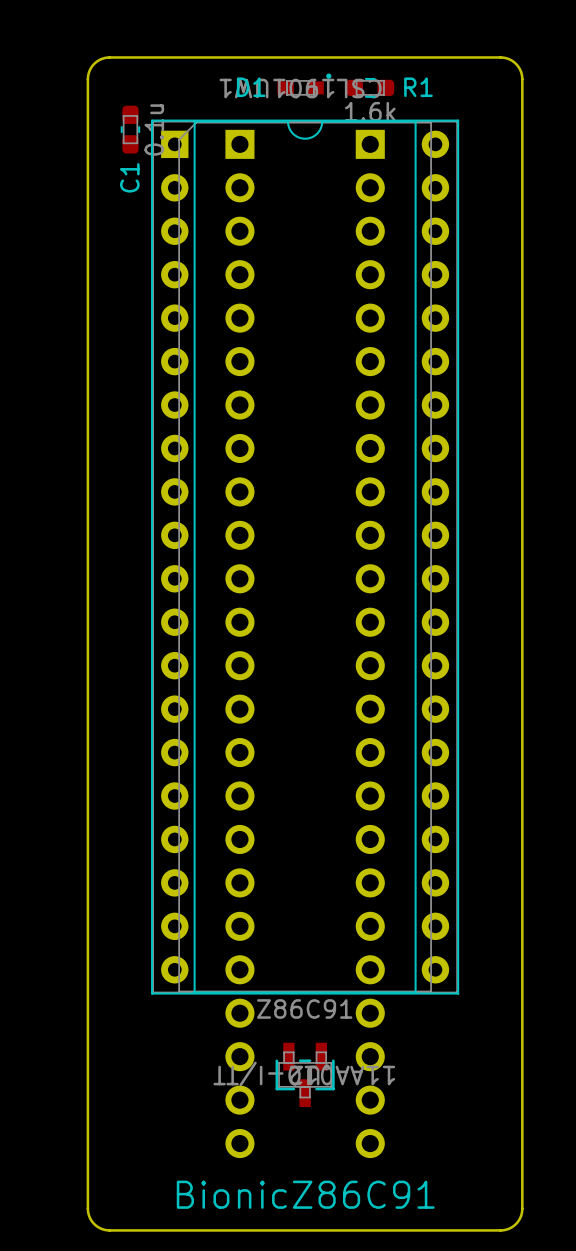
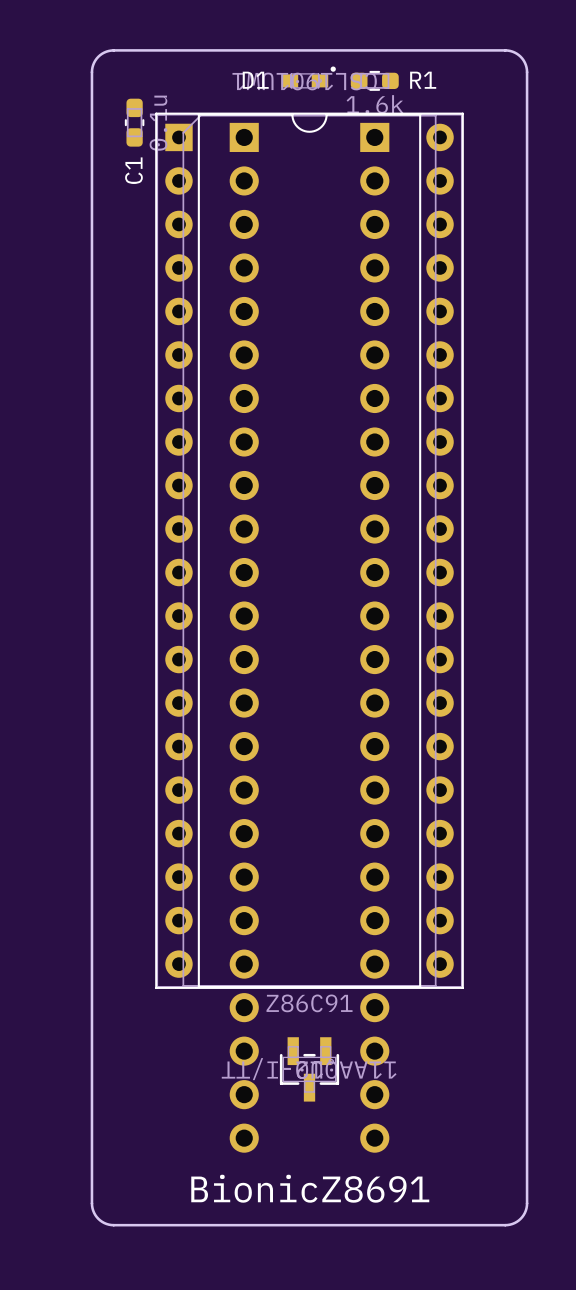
text: BionicZ86C91 (305, 1194) -> BionicZ8691 (310, 1188)

